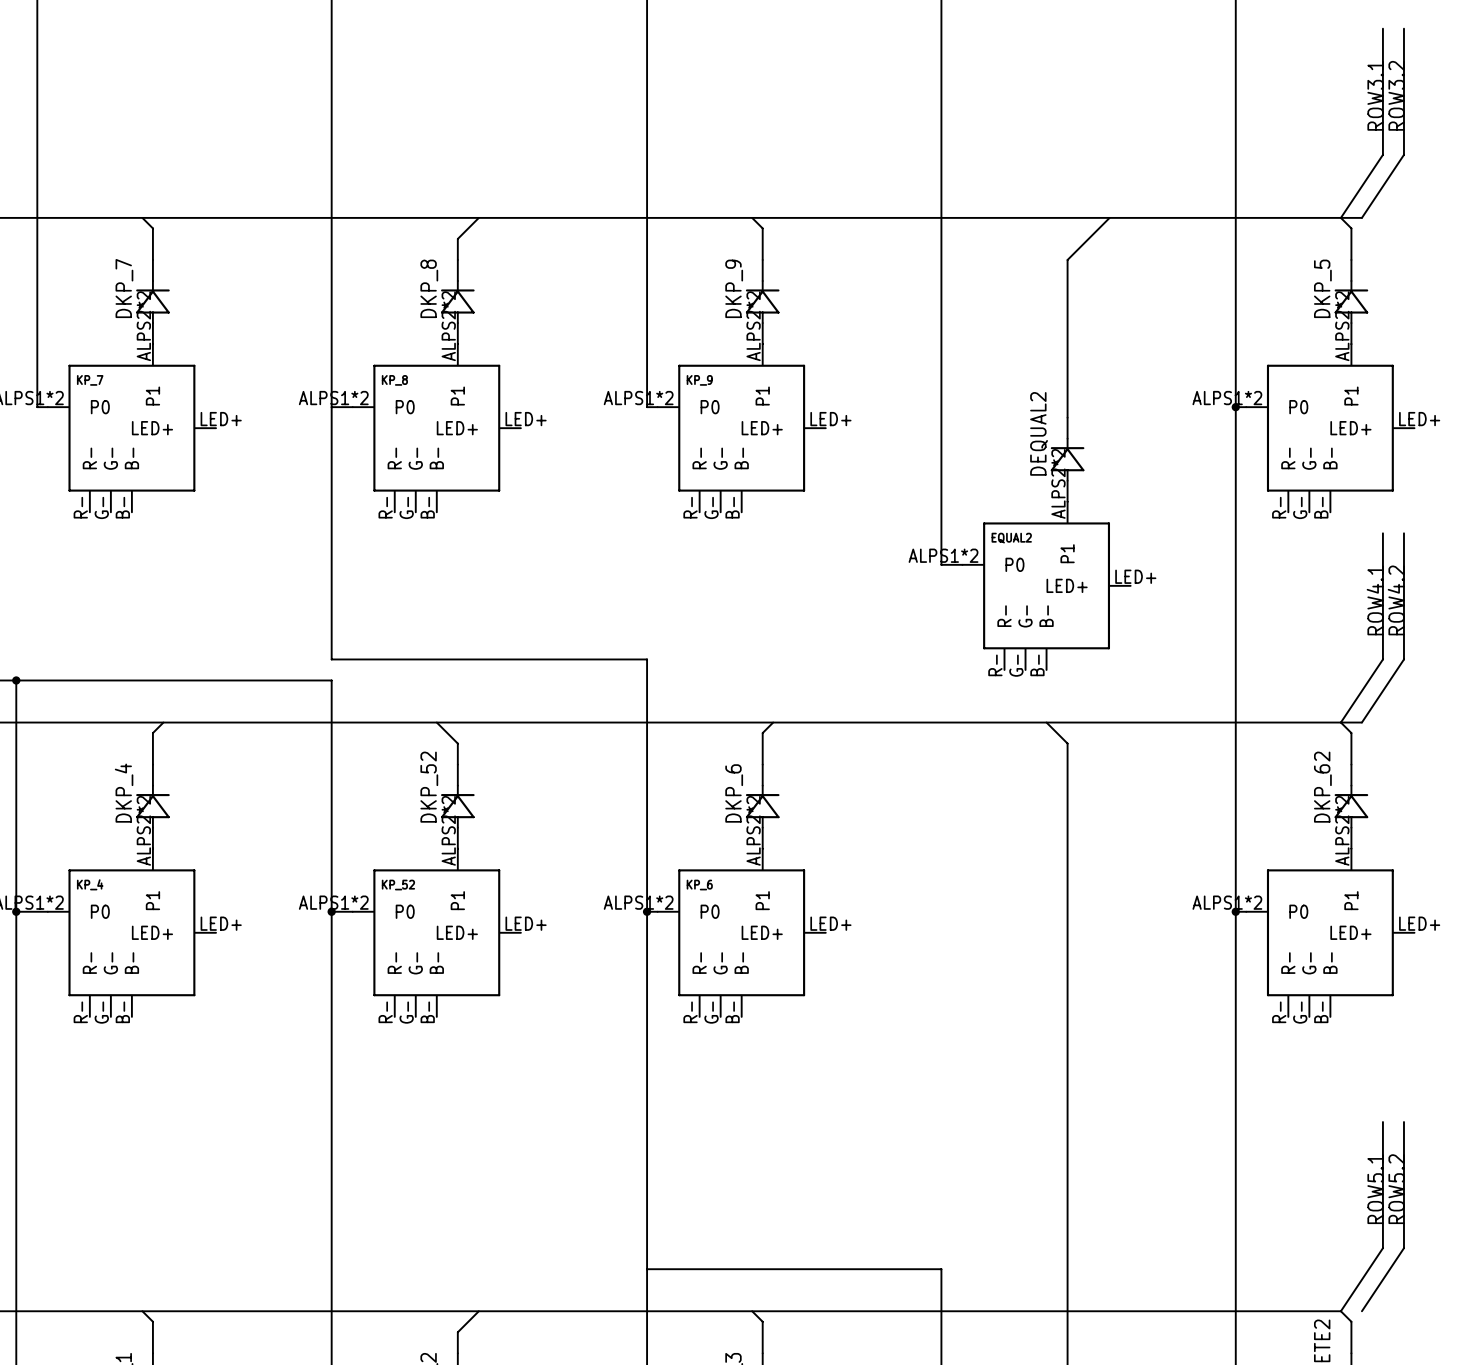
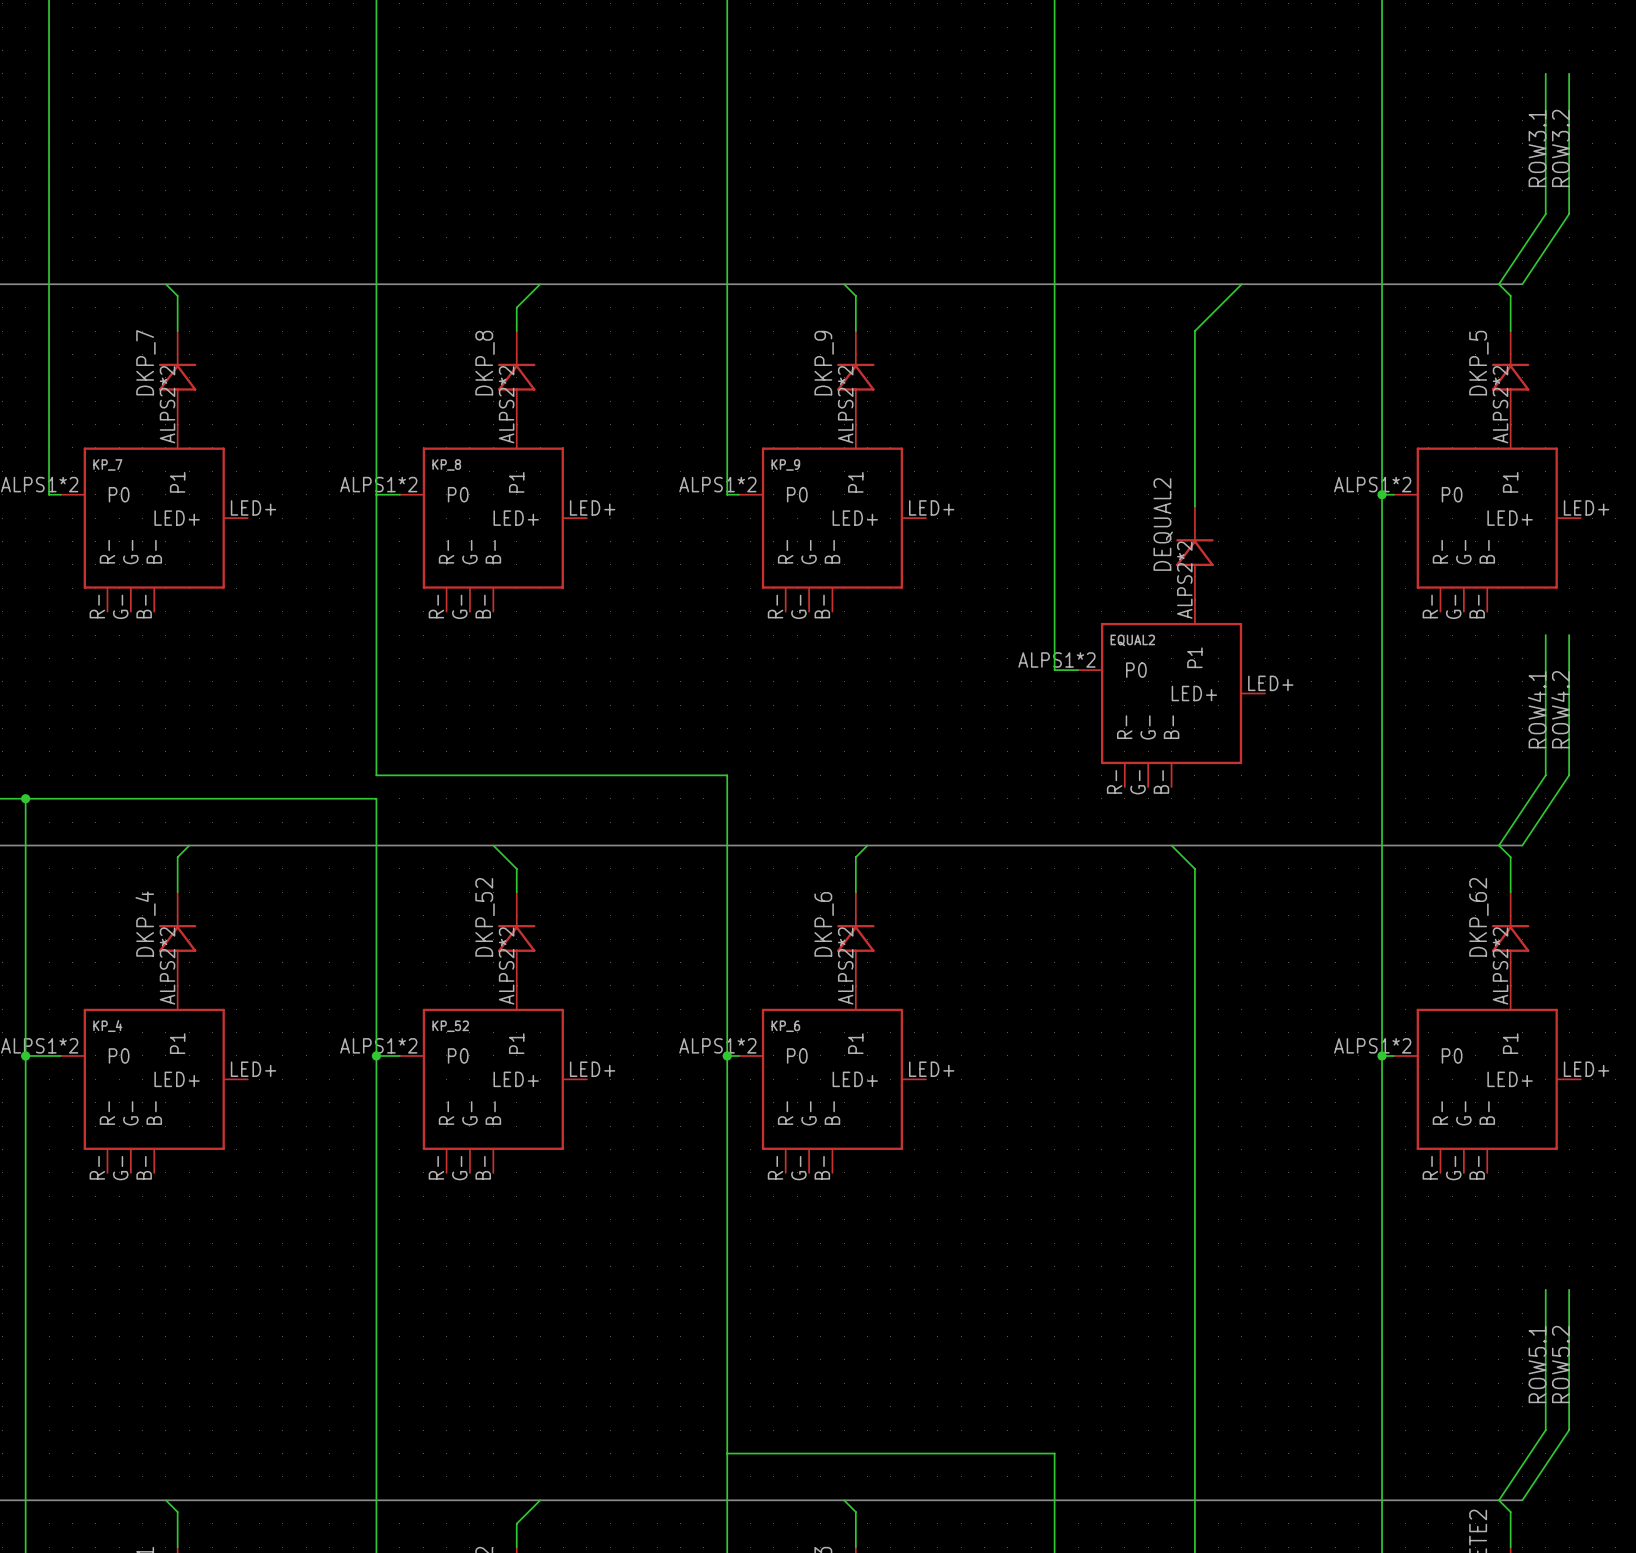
bus: none -> (1498, 1500) (1522, 1500)

